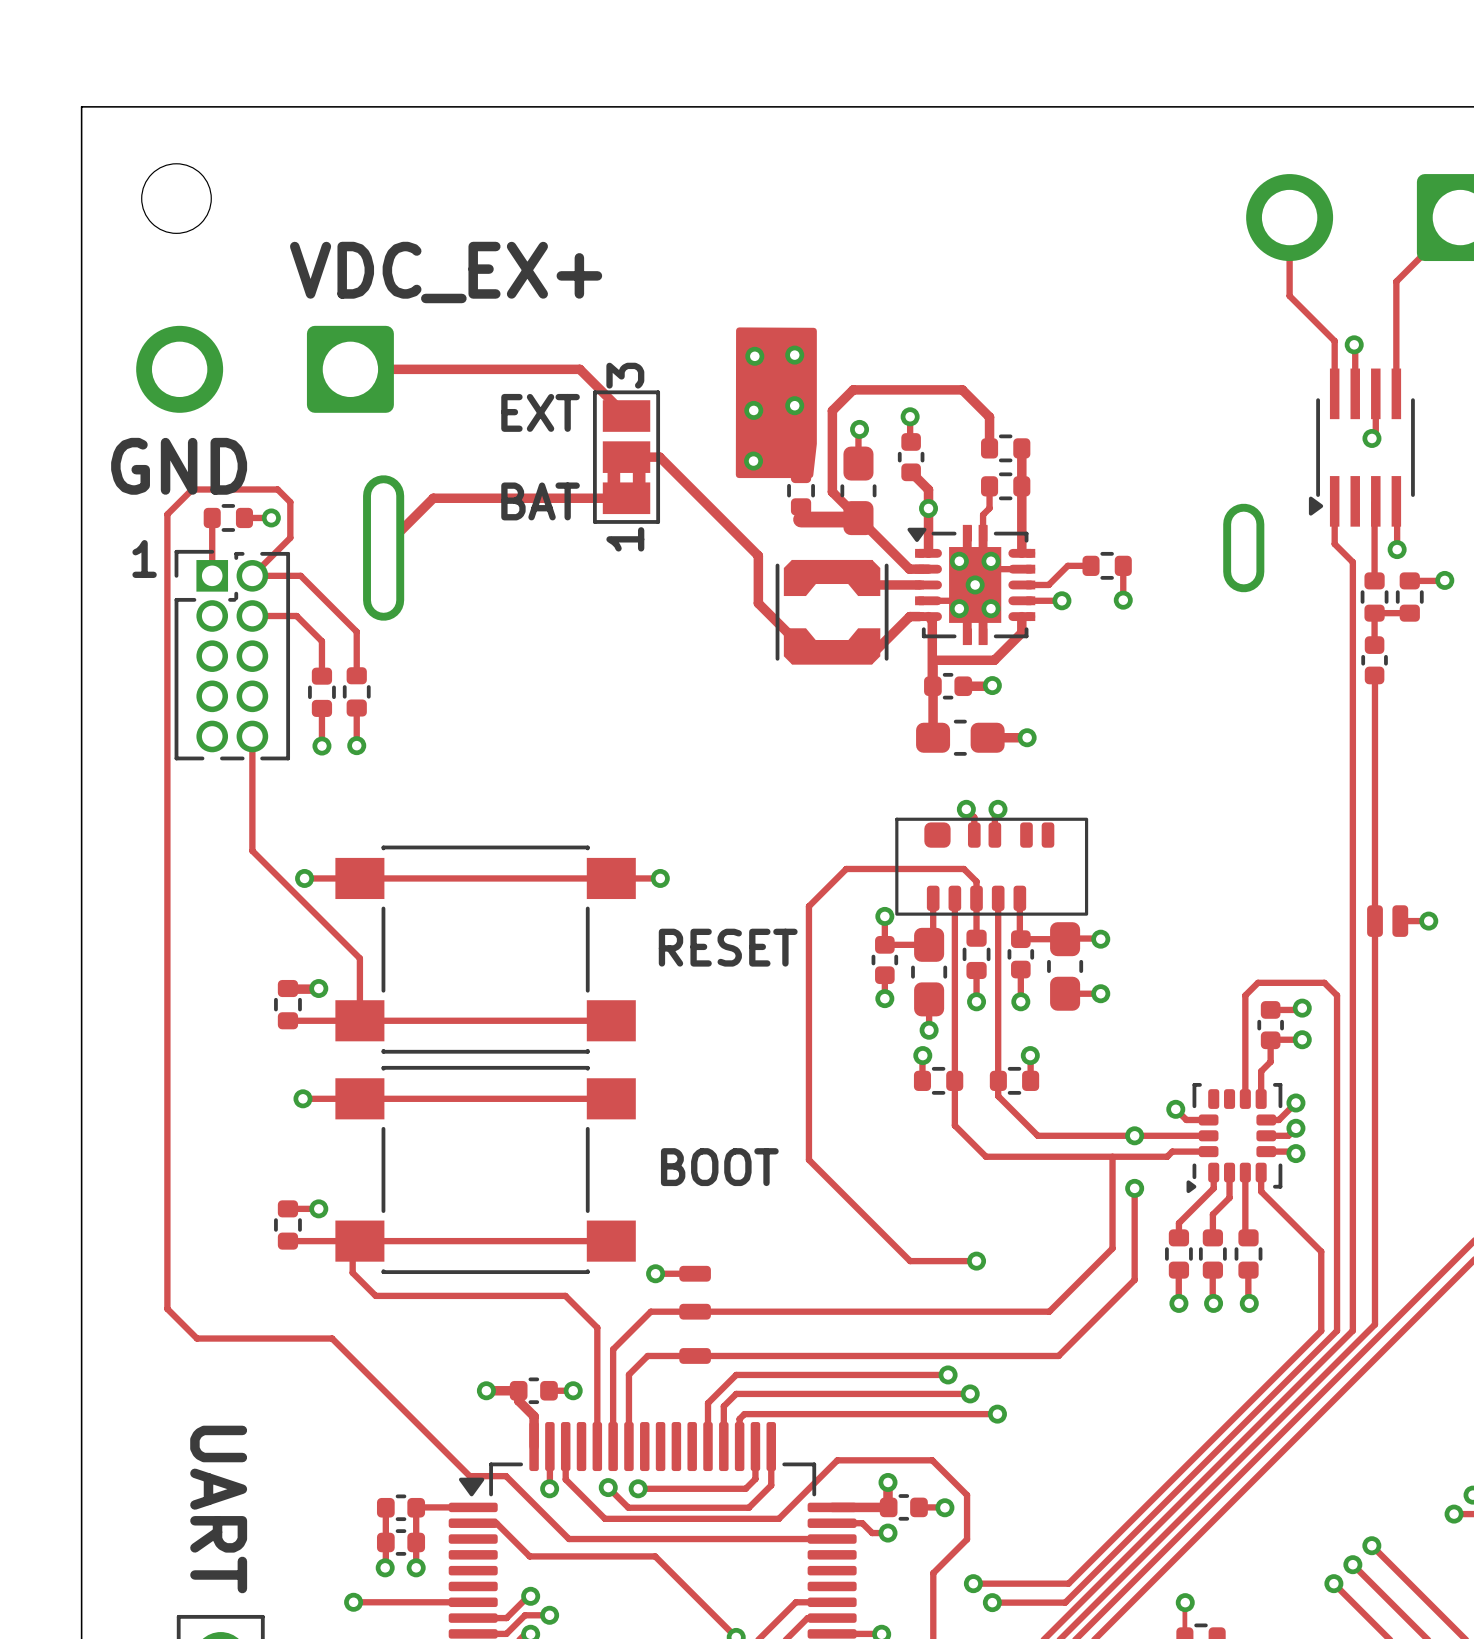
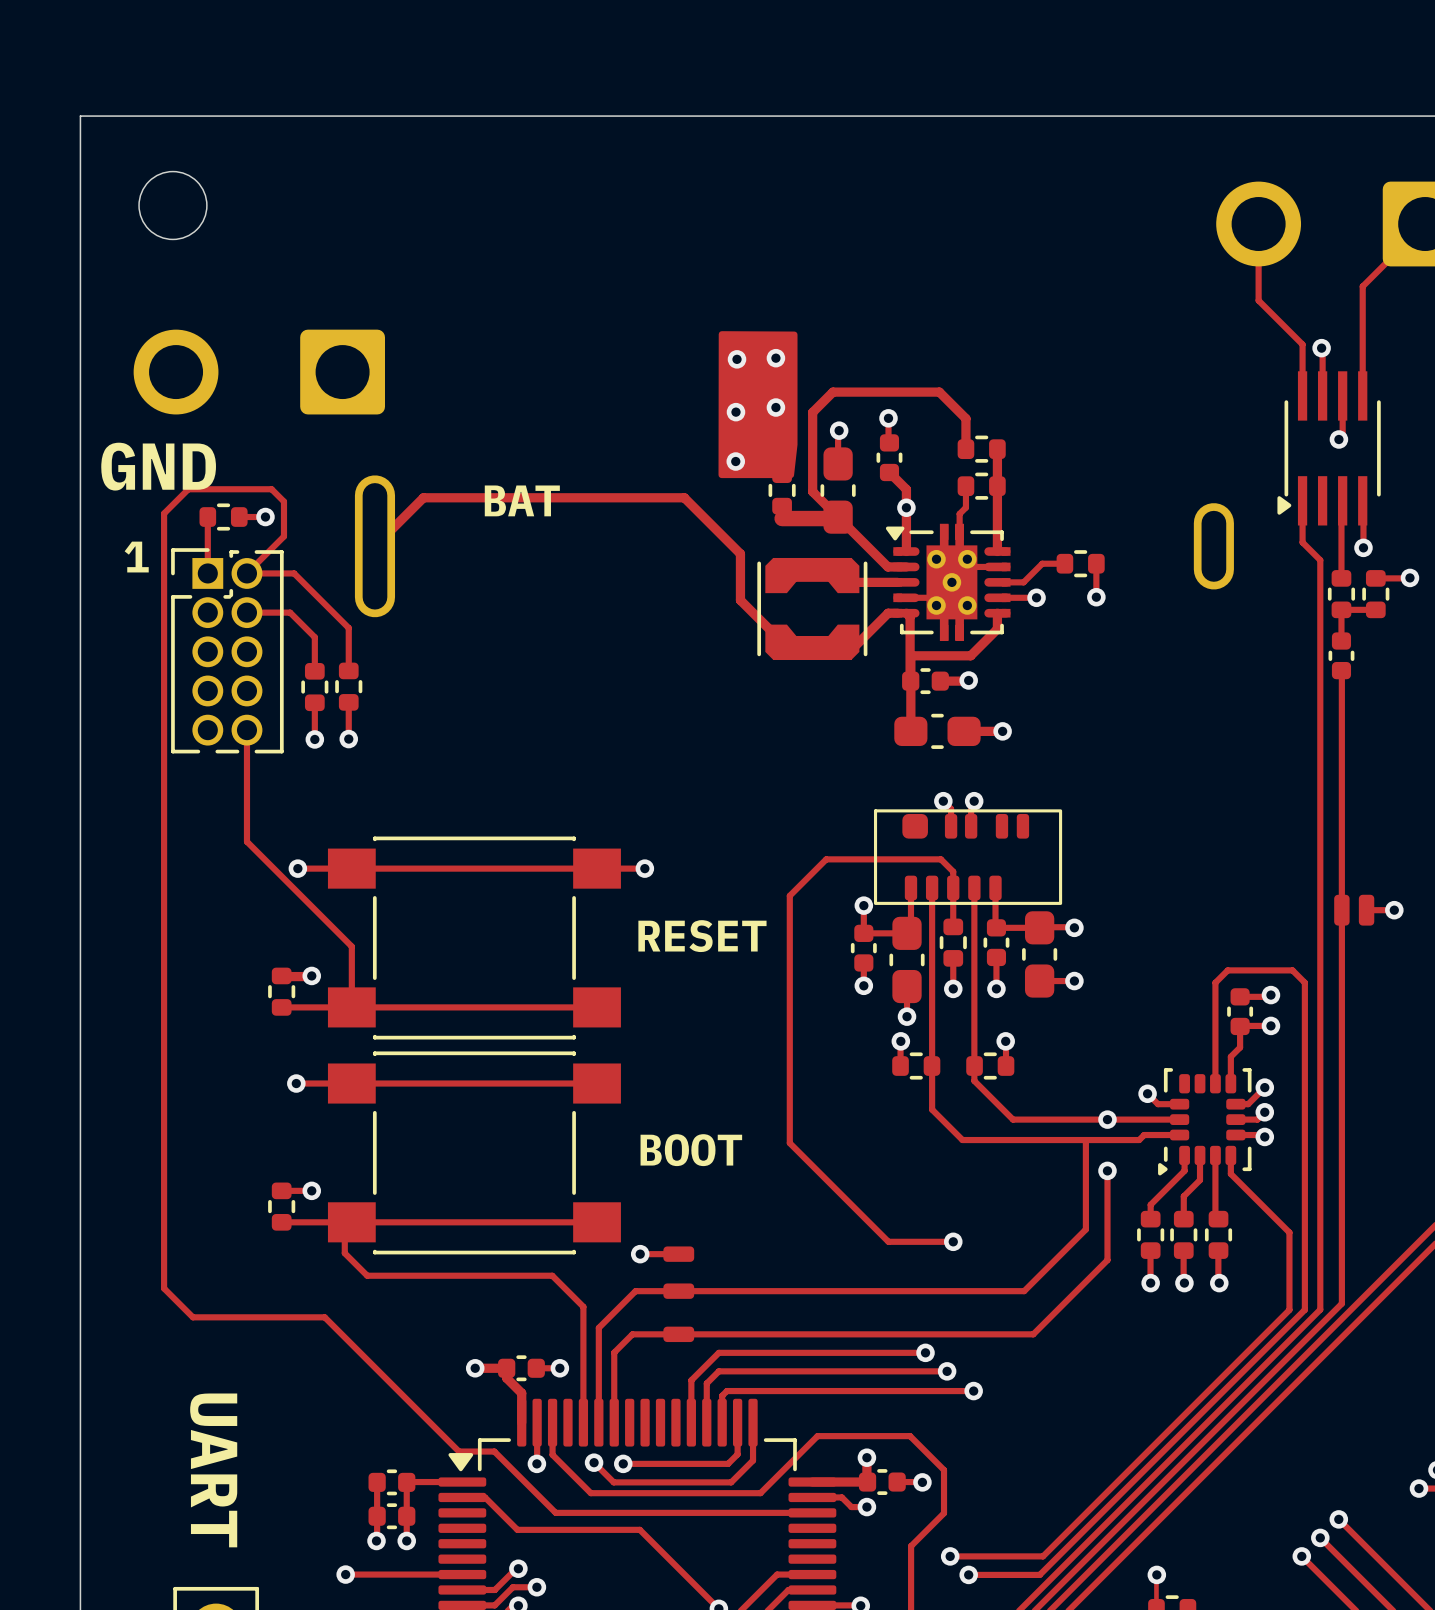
text: VDC_EX+ (446, 272) -> none
track: (350, 369) (579, 369) (626, 416) -> none
text: EXT (540, 412) -> none
track: (626, 457) (659, 457) (700, 498) -> (611, 497) (684, 497)
part: (626, 457) -> none

